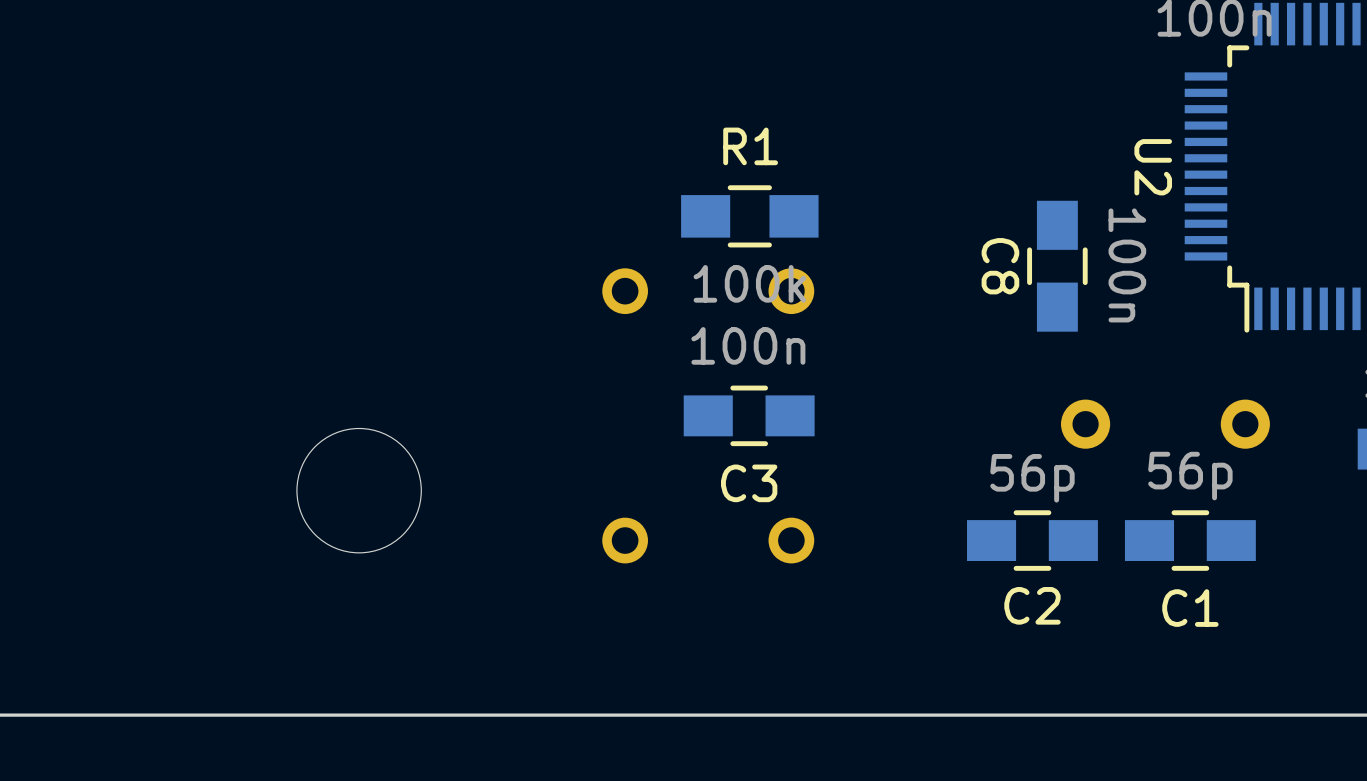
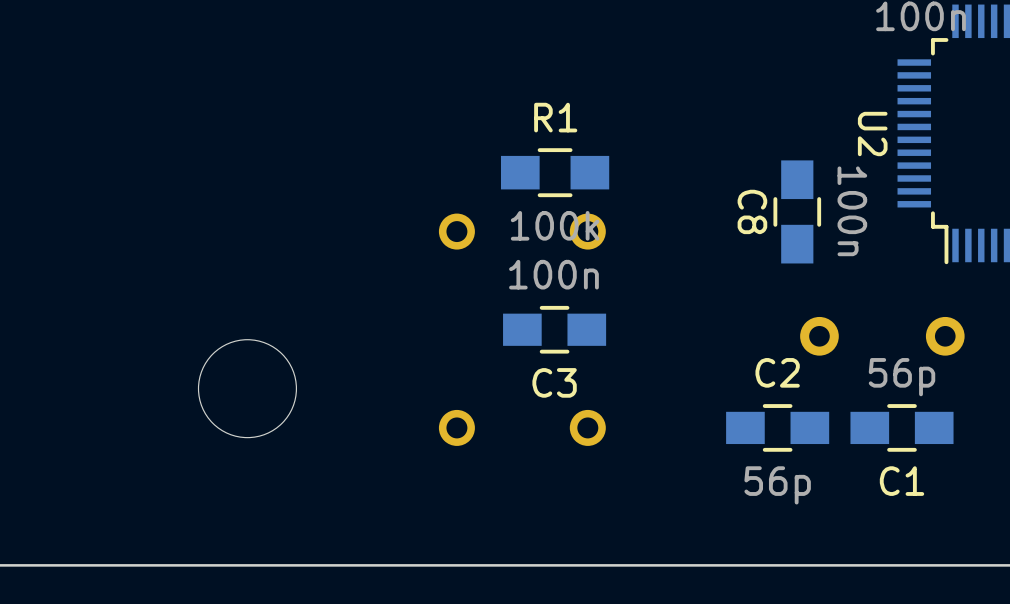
C2 value position: 56p (1032, 478) -> 56p (777, 485)
C2 name position: C2 (1032, 605) -> C2 (777, 372)

